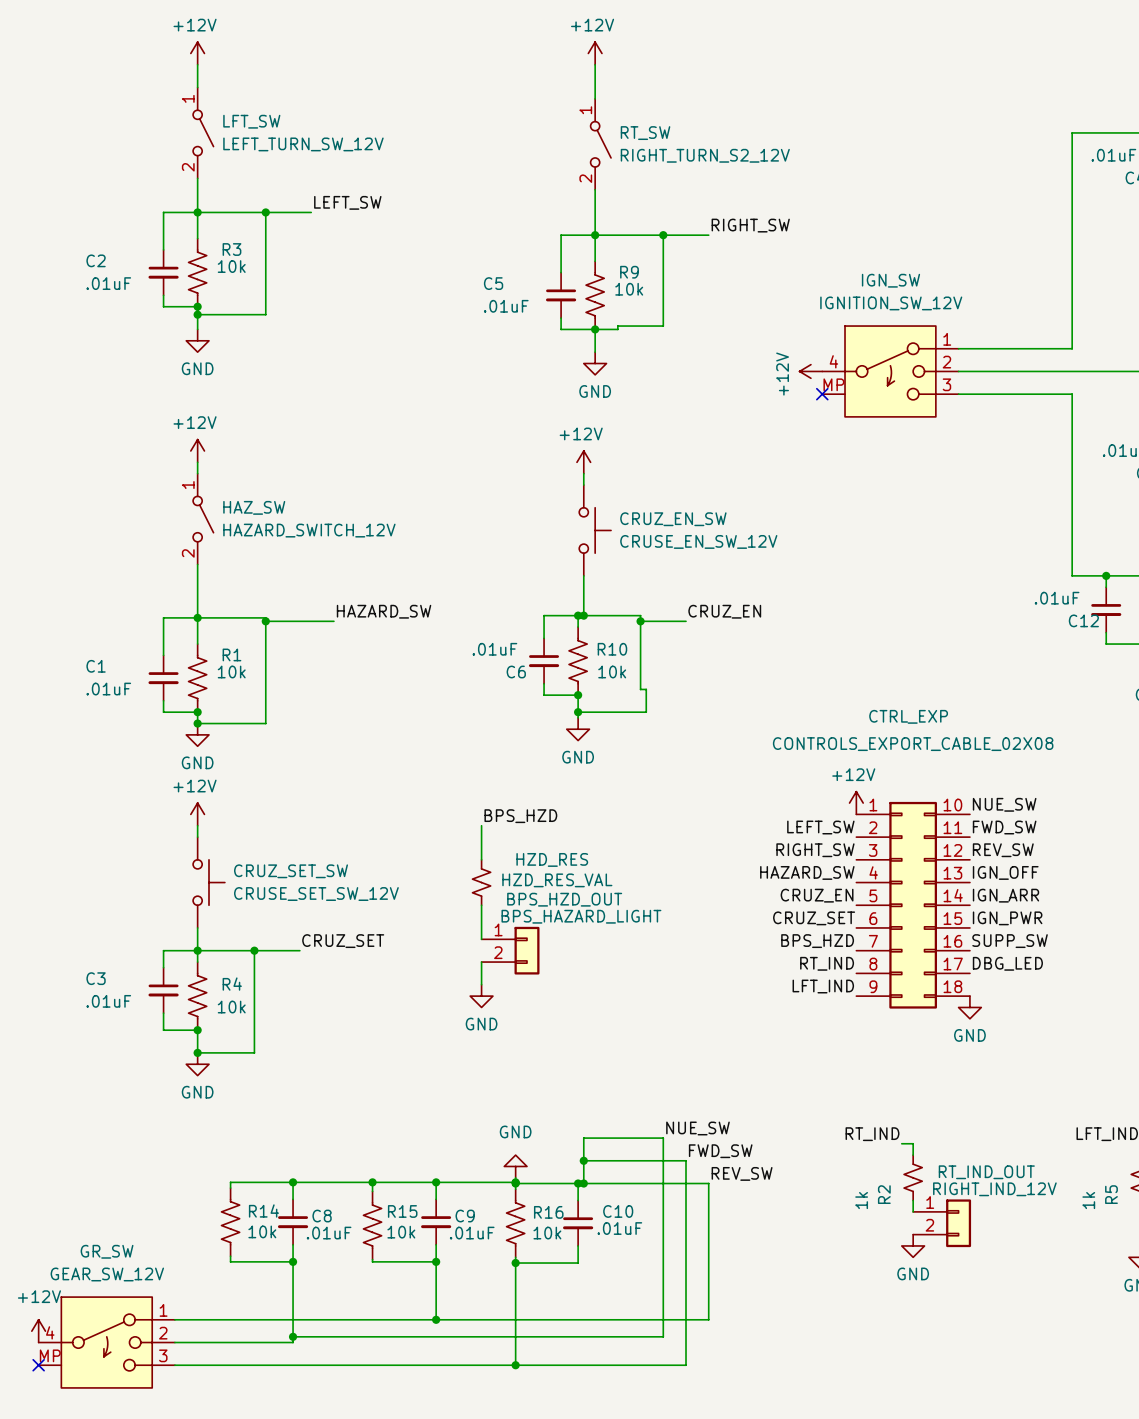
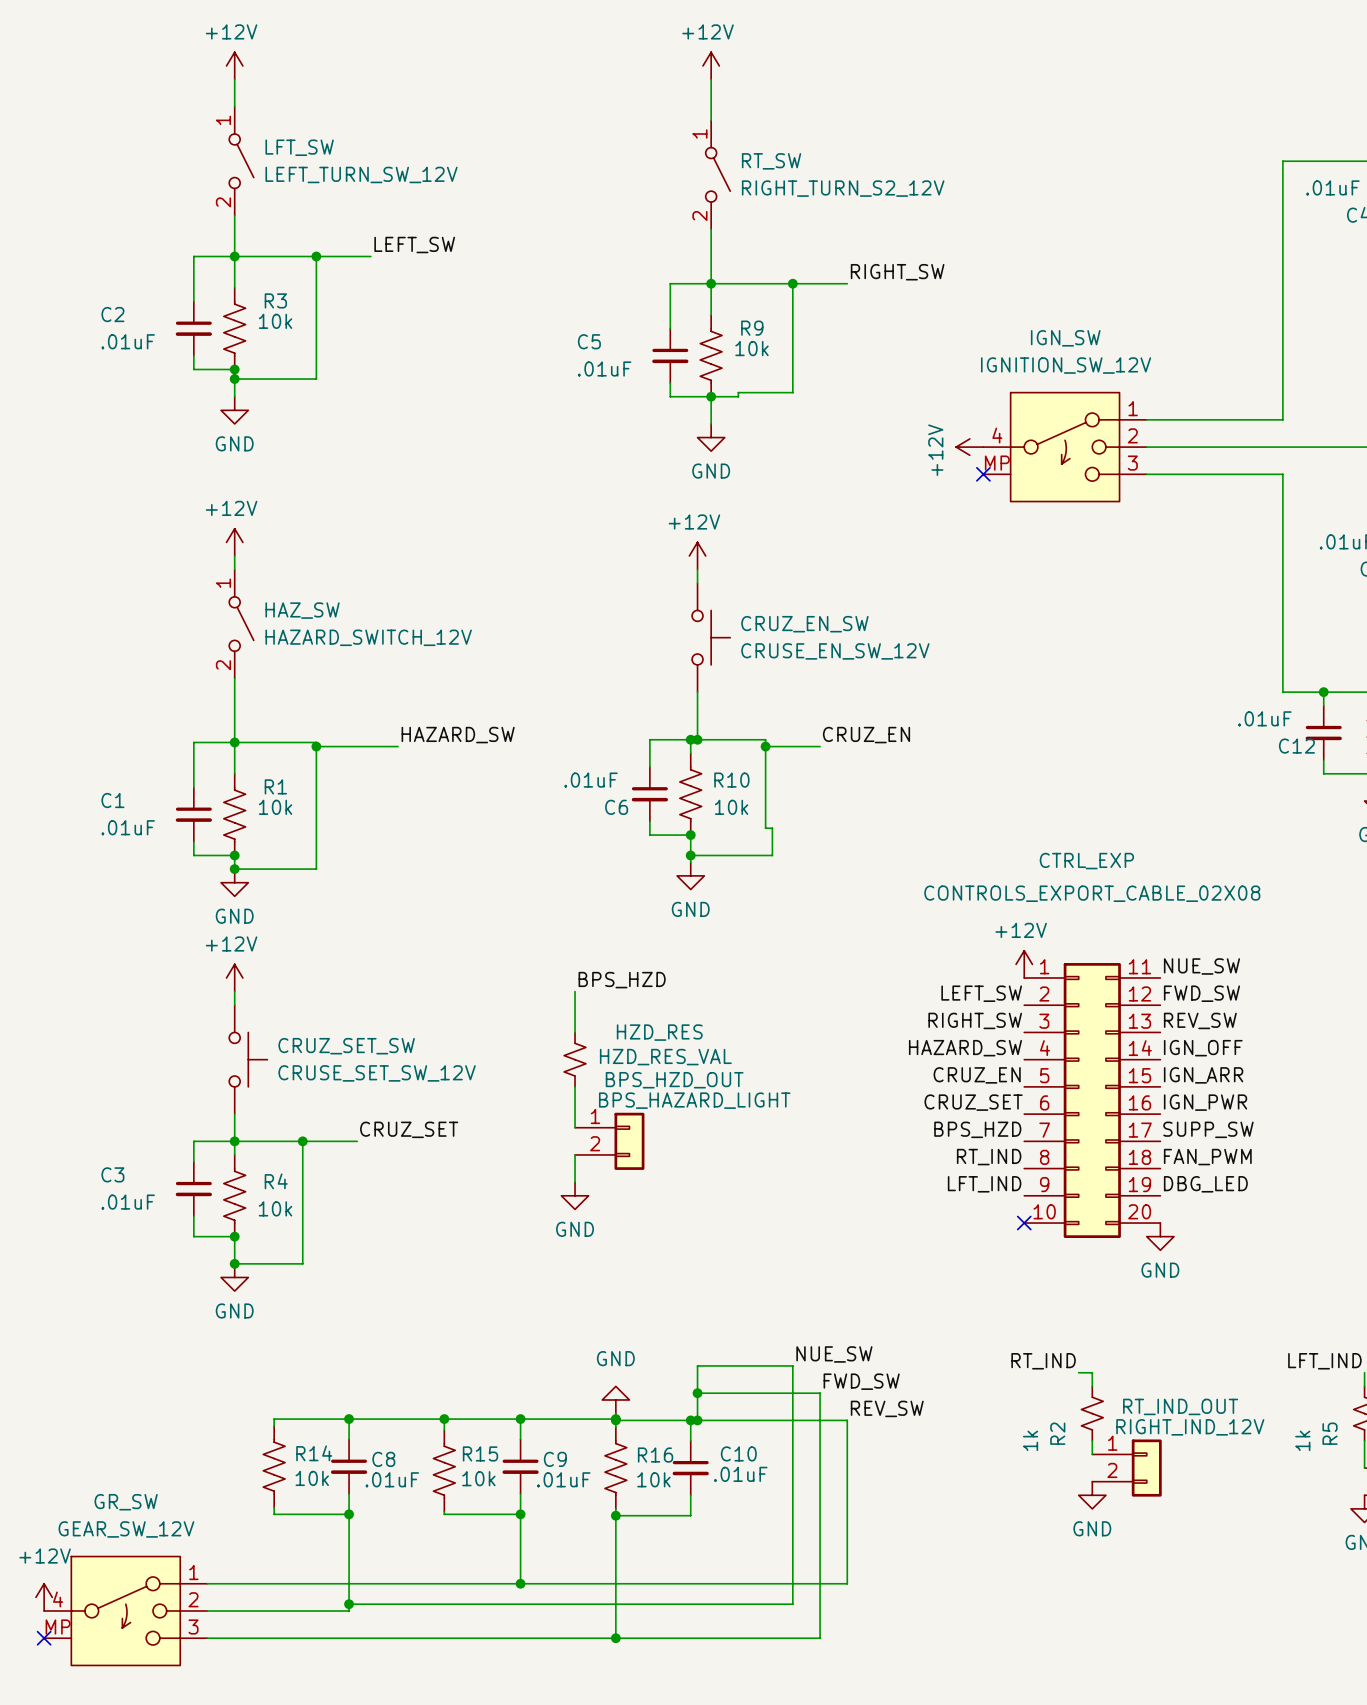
CTRL_EXP: CONTROLS_EXPORT_CABLE_02X08 (913, 905) -> none
CTRL_EXP: none -> CONTROLS_EXPORT_CABLE_02X08 (1092, 1100)
label: DBG_LED (1007, 963) -> FAN_PWM (1207, 1157)
label: none -> DBG_LED (1205, 1184)
power symbol position: GND (969, 1007) -> GND (1160, 1236)
no-connect mark: none -> (1024, 1223)

